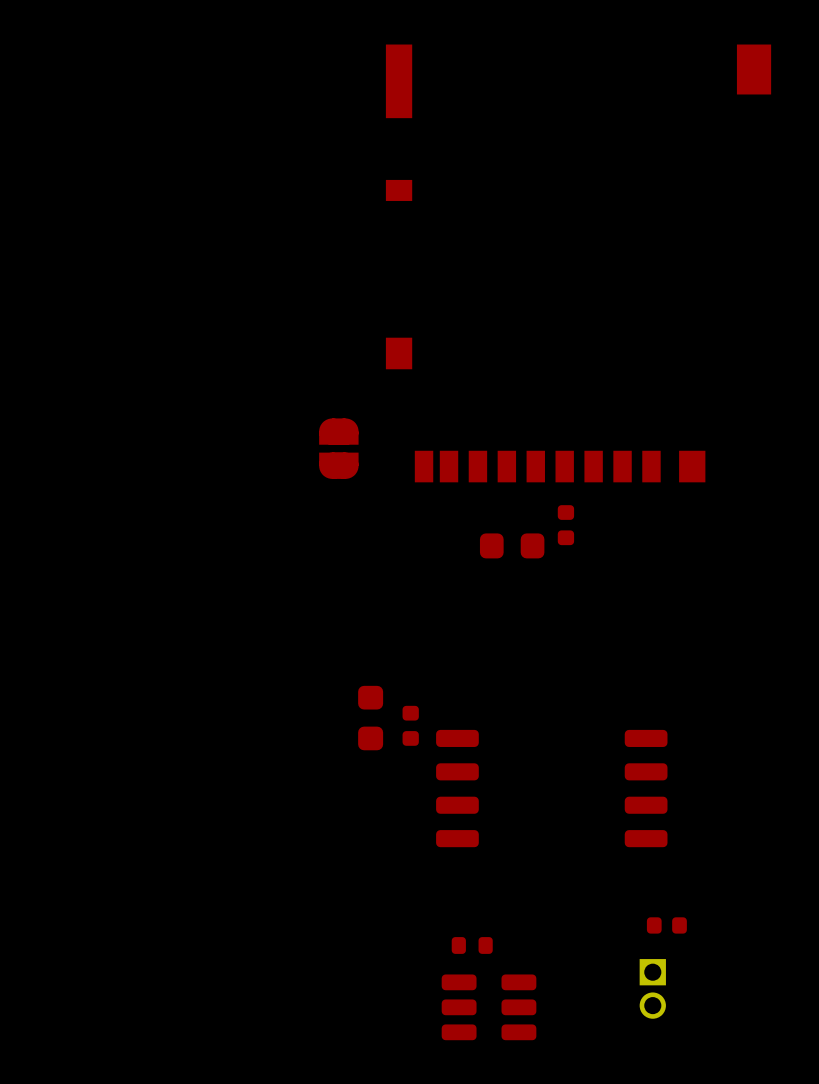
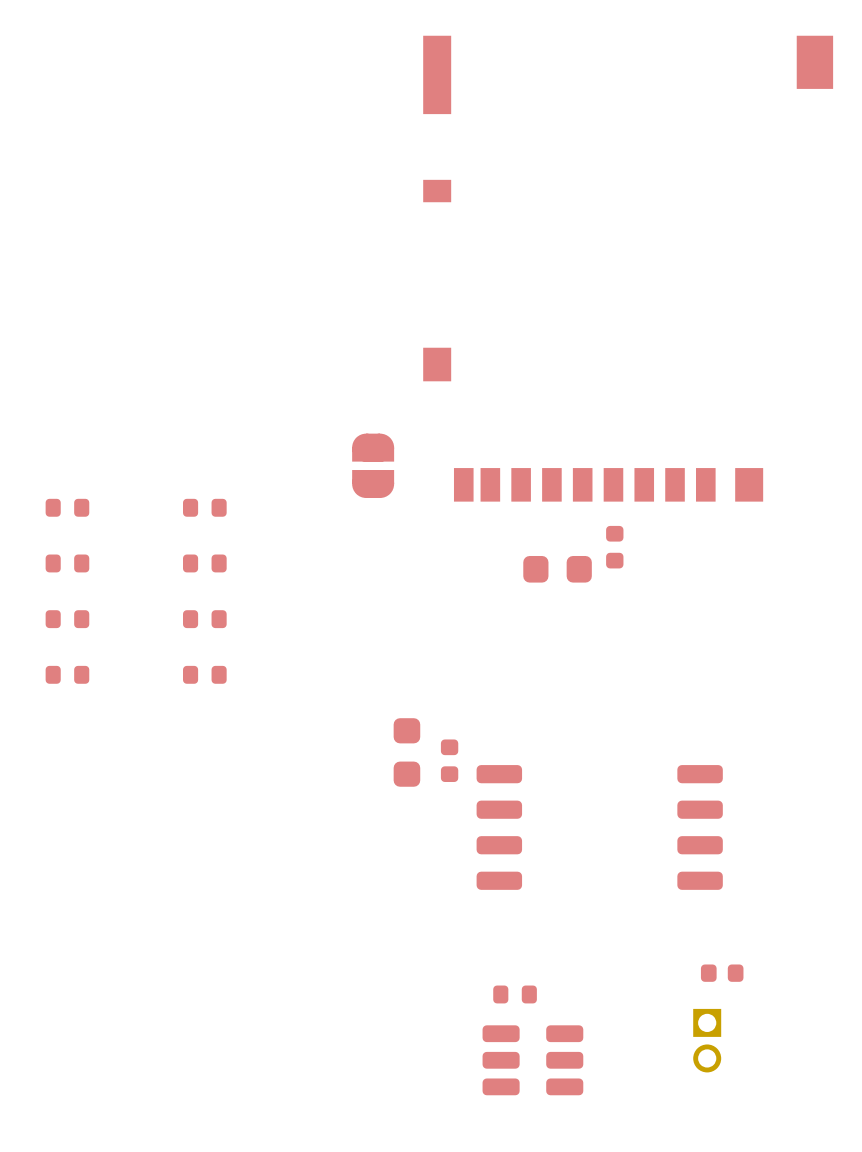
part: none -> (67, 507)
part: none -> (204, 507)
part: none -> (67, 563)
part: none -> (204, 563)
part: none -> (67, 619)
part: none -> (204, 619)
part: none -> (67, 674)
part: none -> (204, 674)

